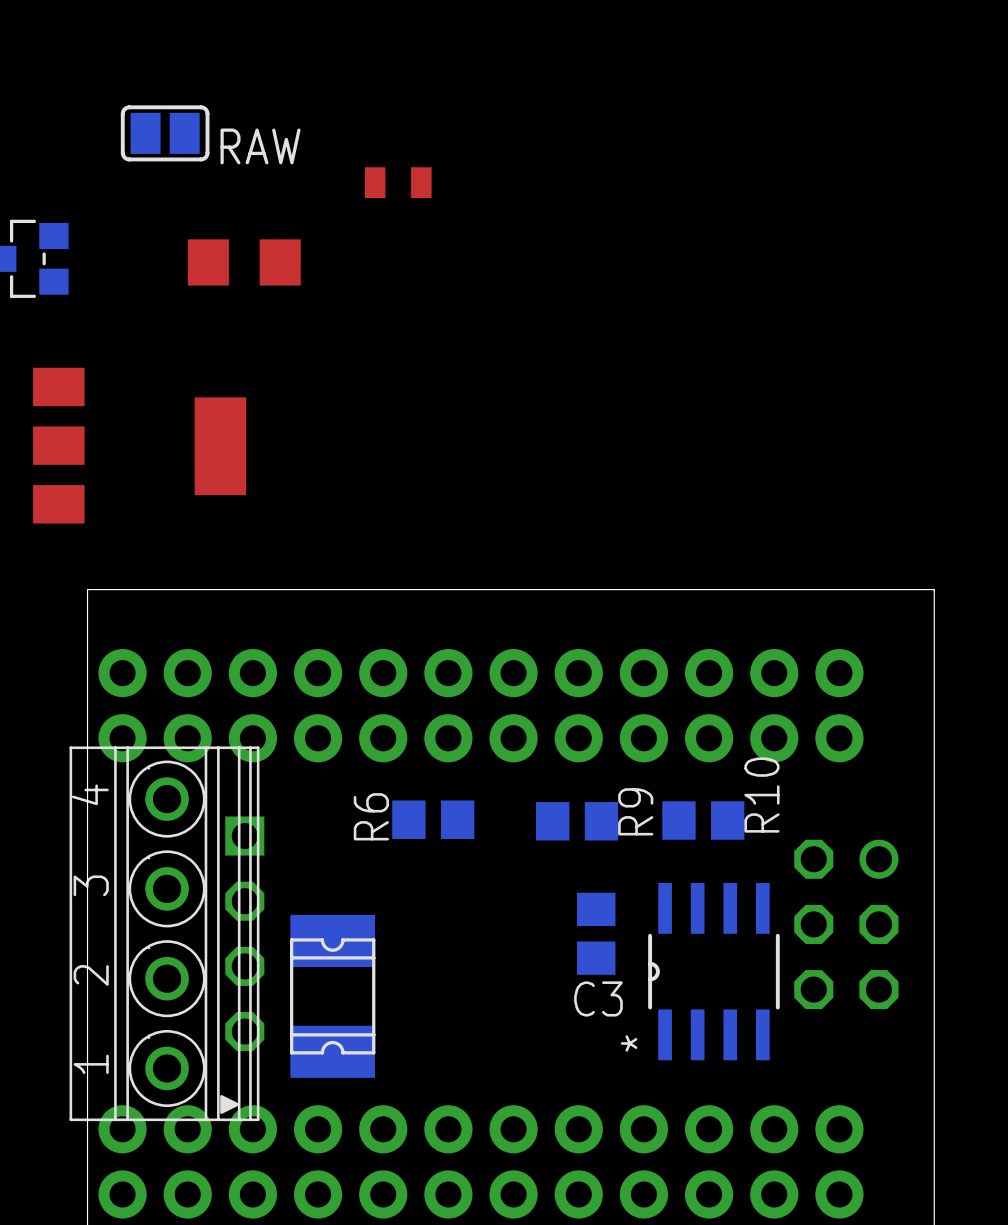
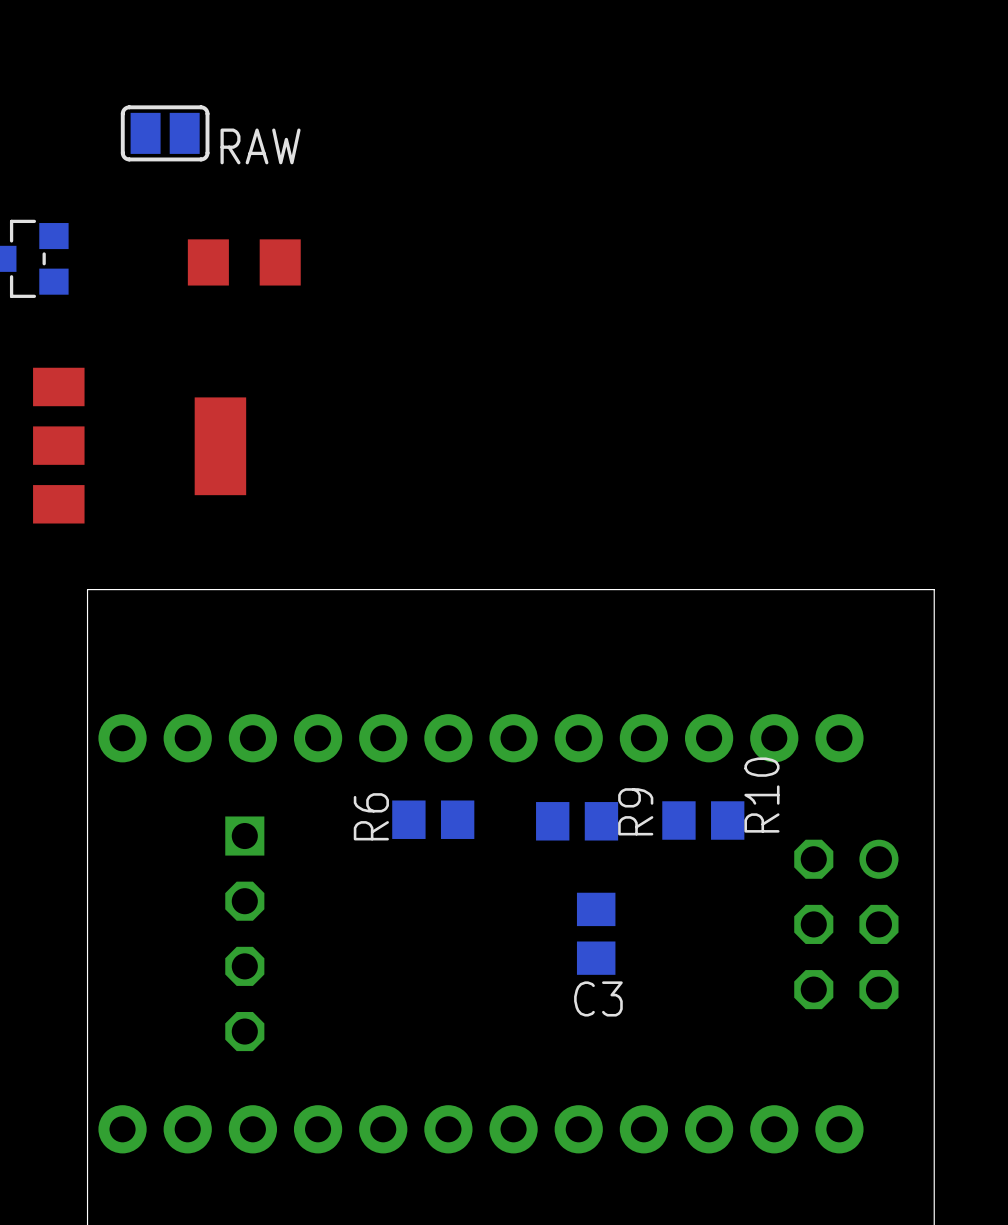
part: (398, 182) -> none
part: (480, 673) -> none
part: (164, 933) -> none
part: (713, 971) -> none
part: (332, 996) -> none
part: (480, 1194) -> none

